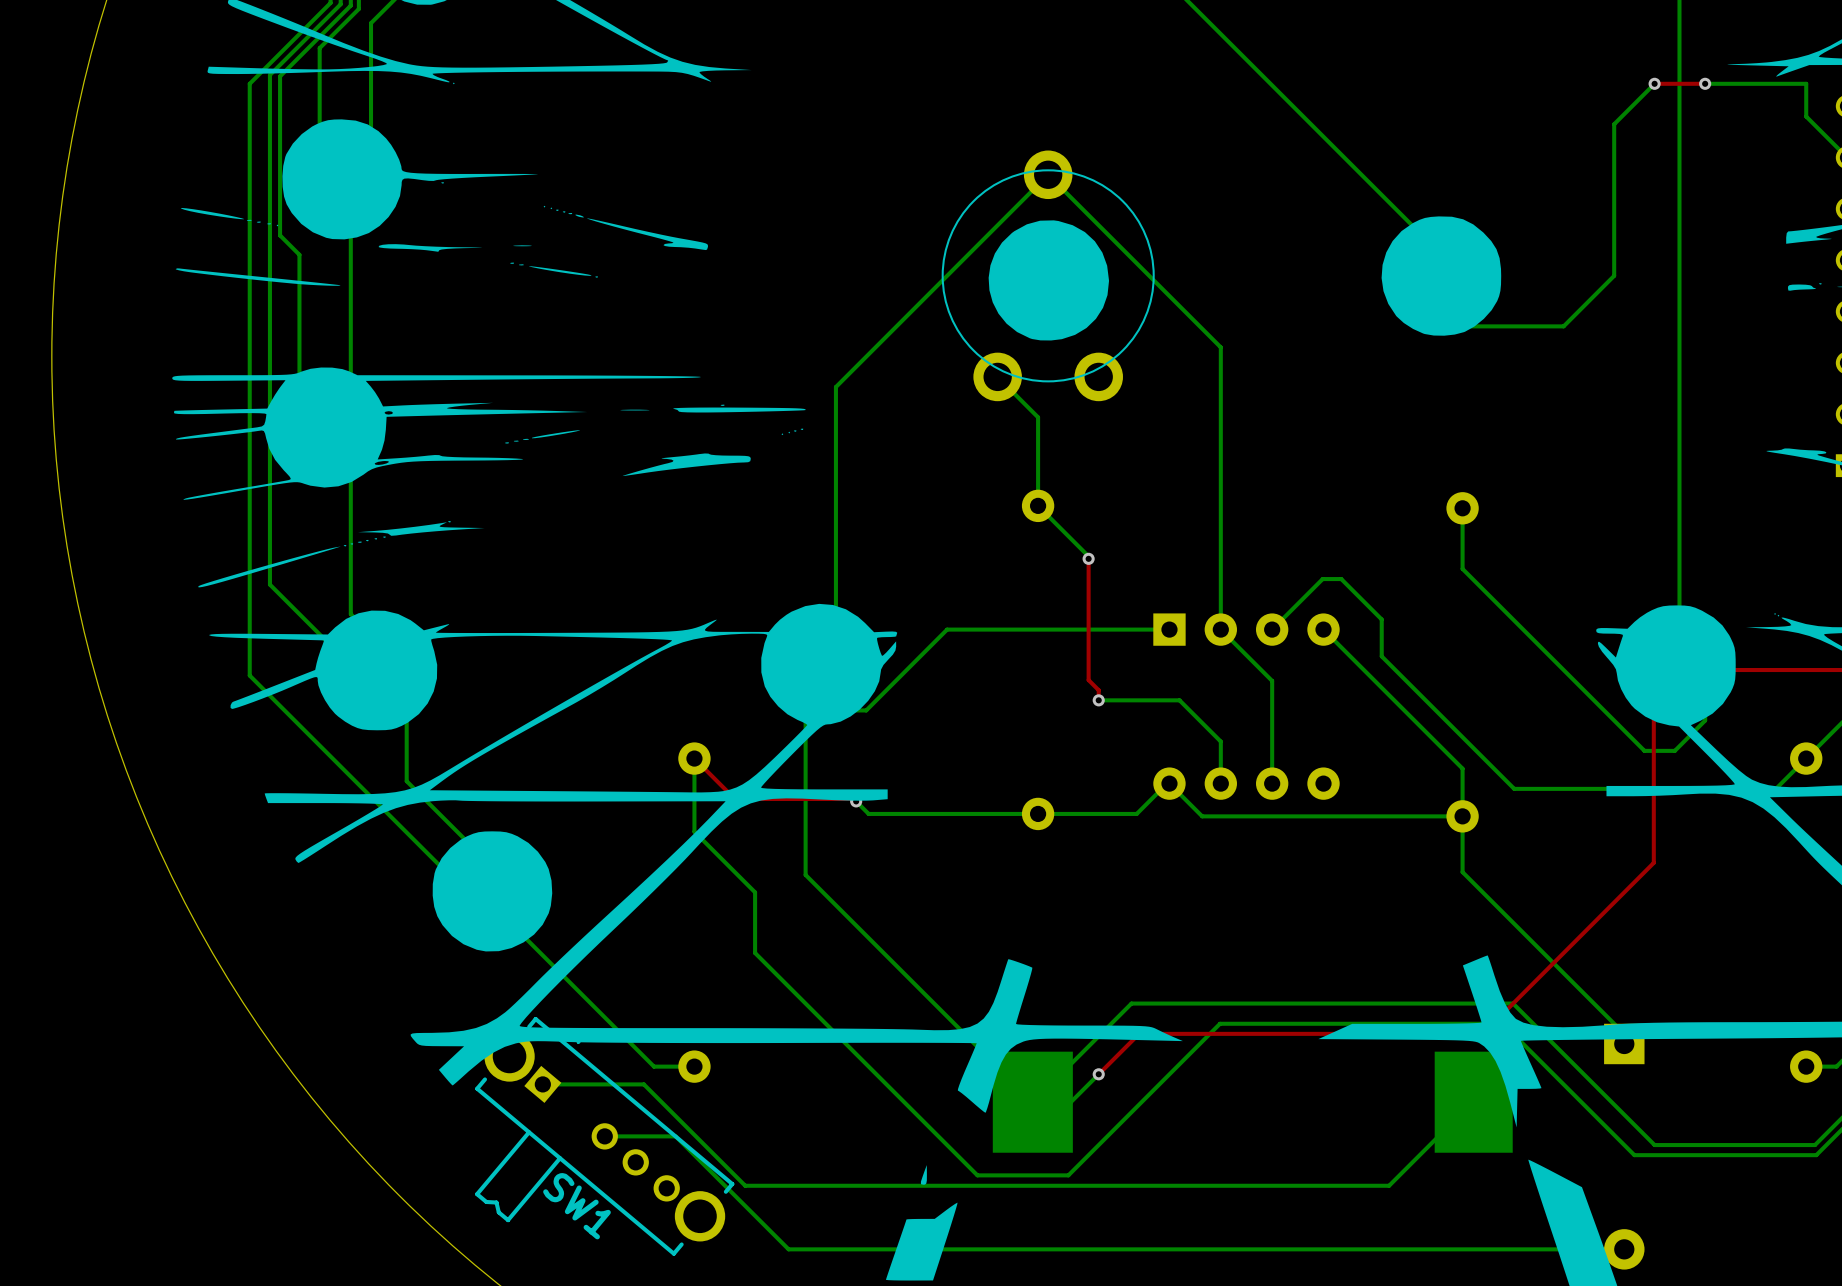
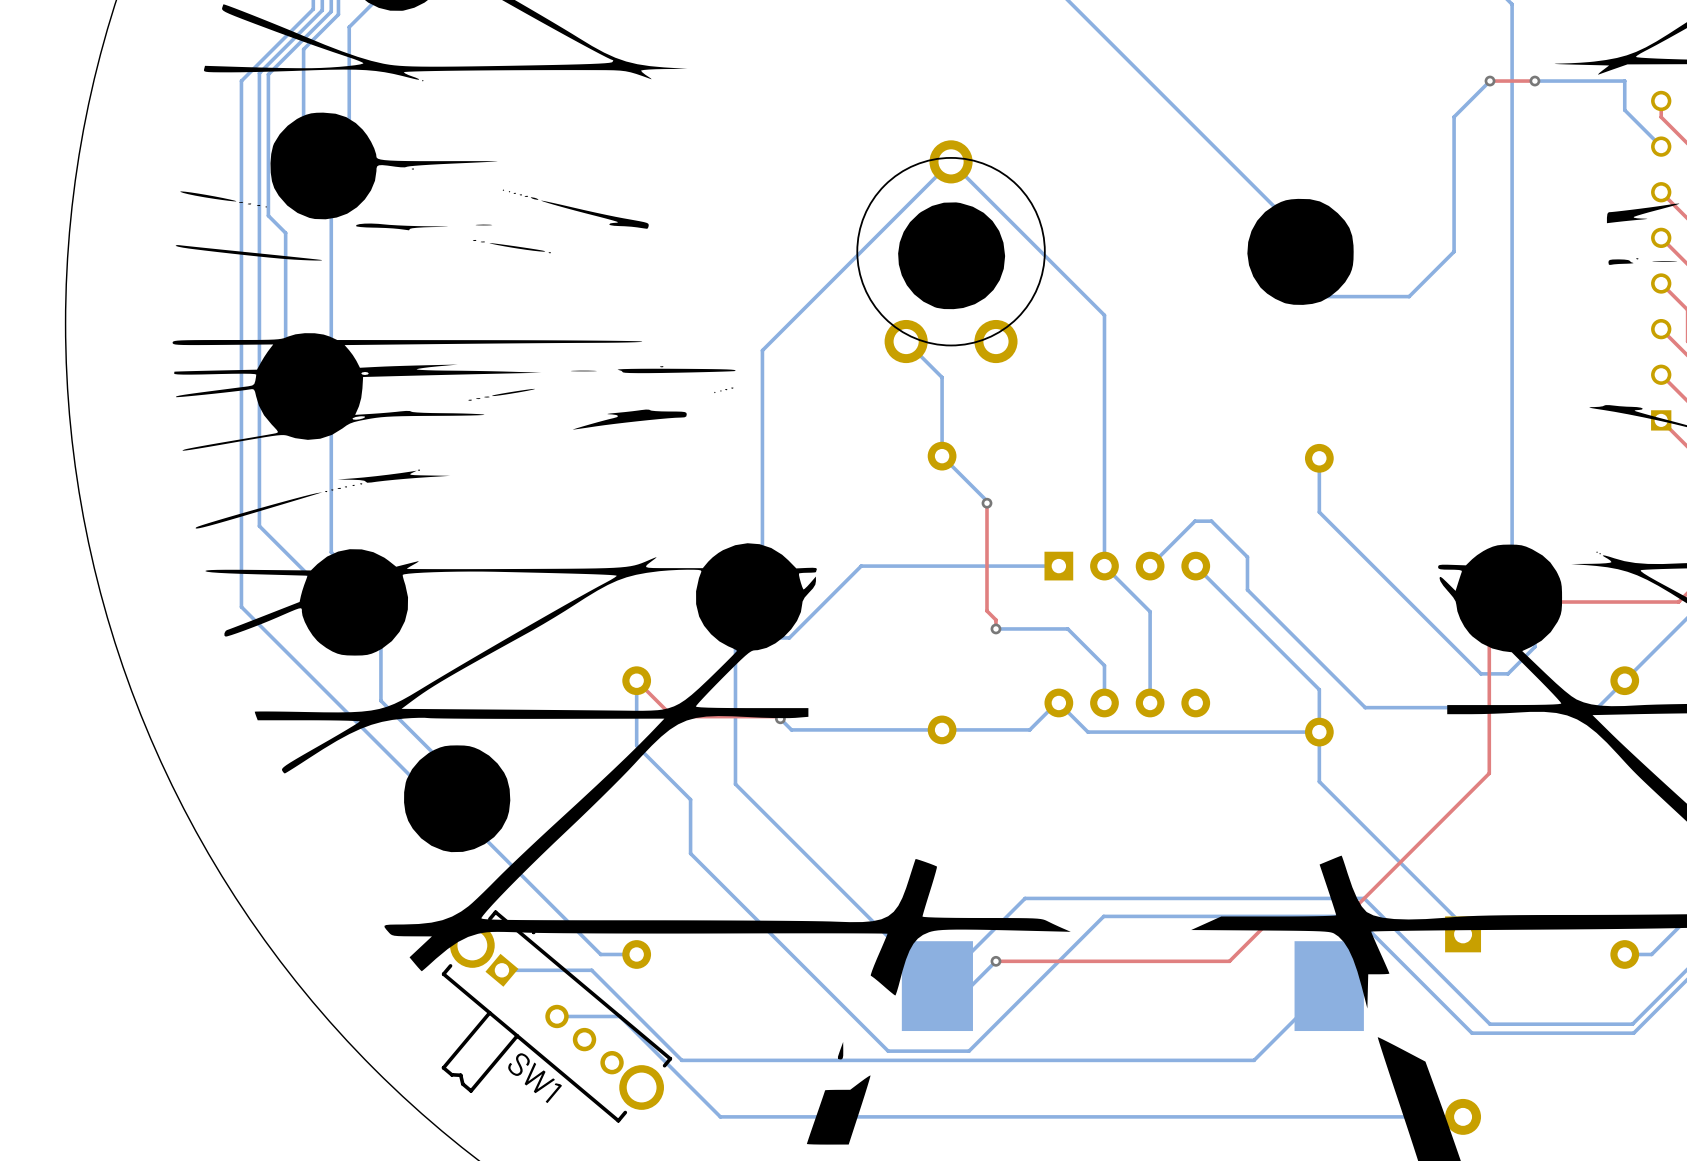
top track: (1401, 1033) (1139, 1033) (1098, 1074) -> (1265, 925) (1229, 961) (995, 961)

